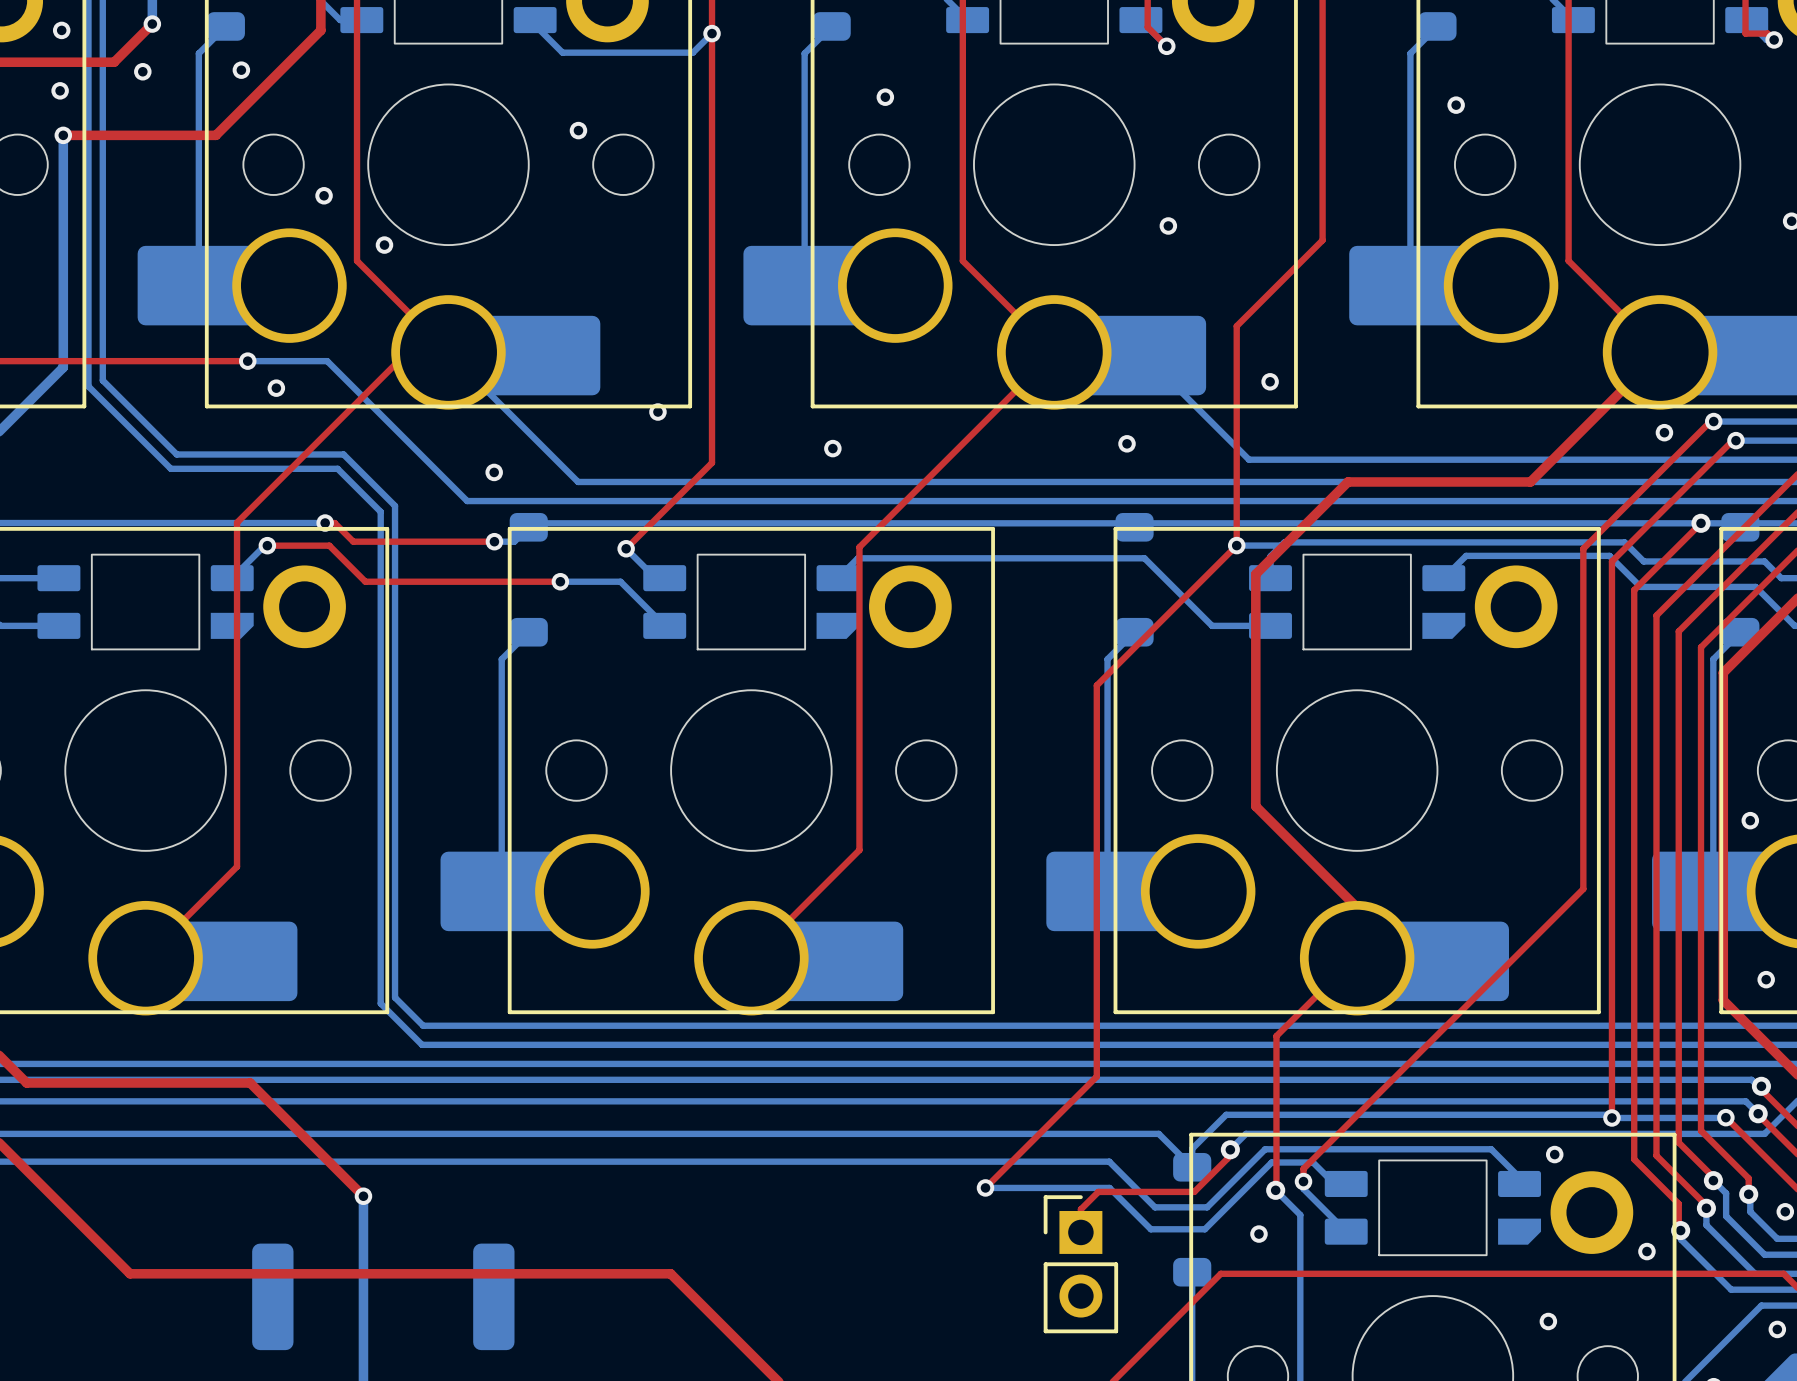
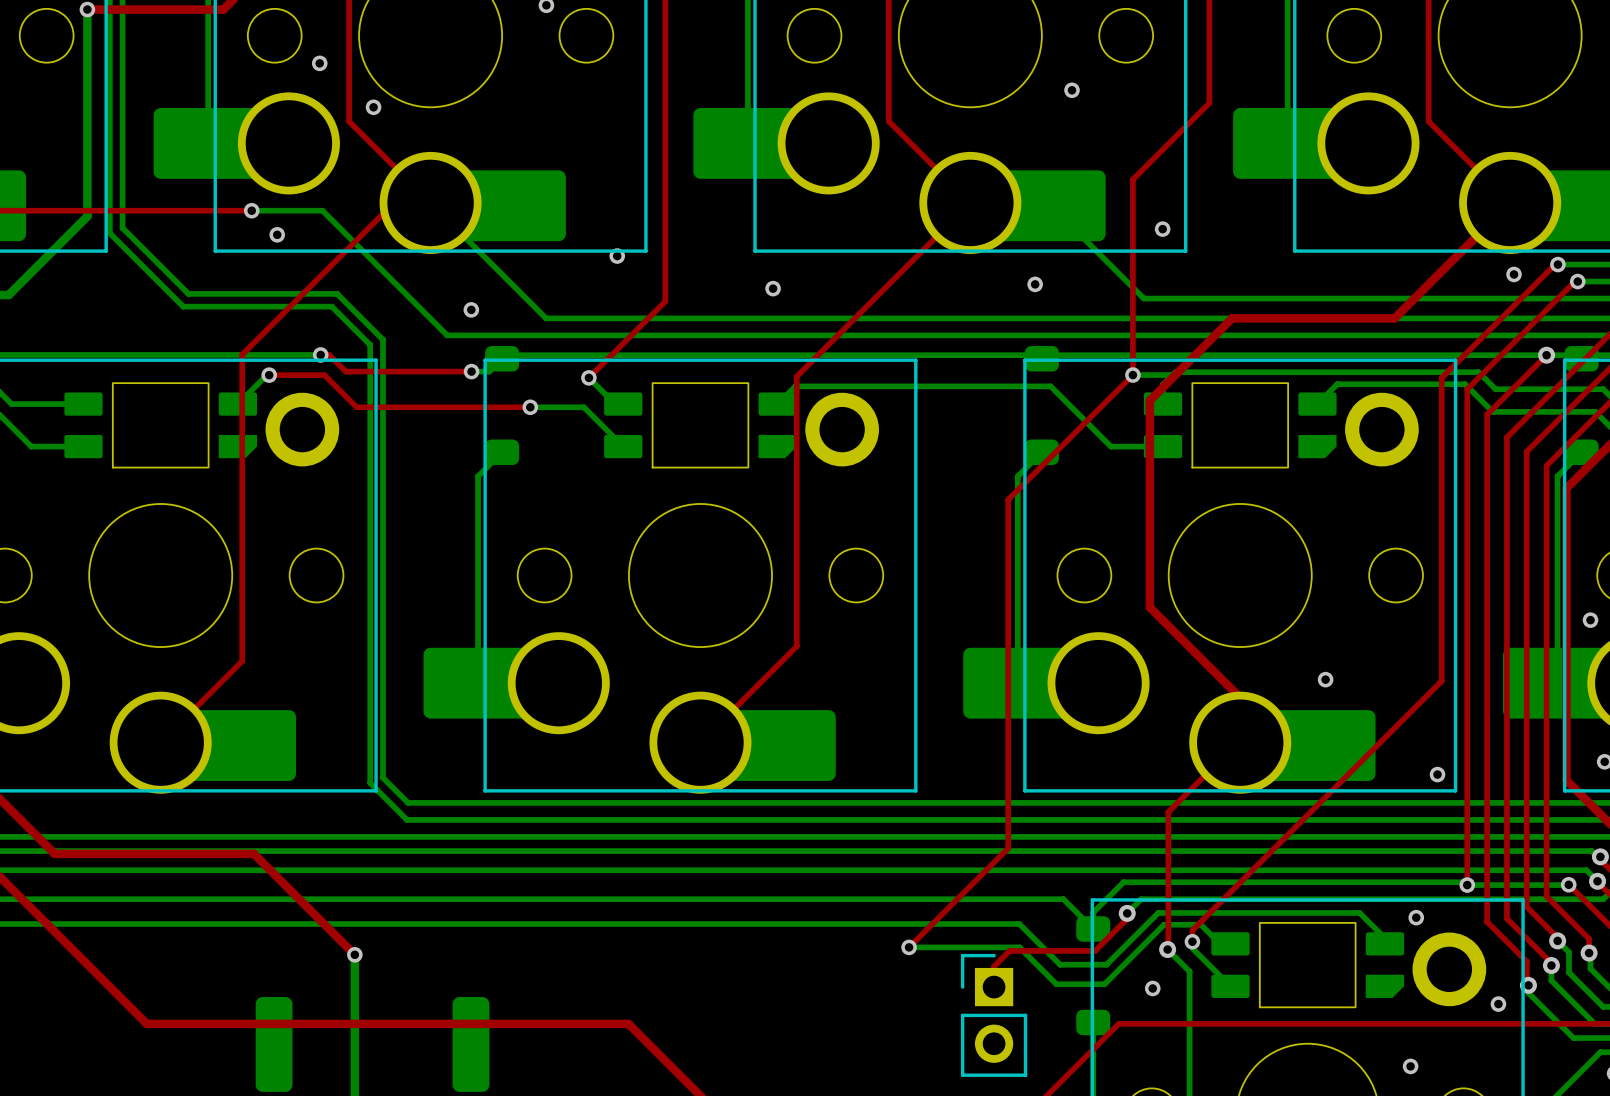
via: none -> (1325, 679)
via: none -> (1437, 774)

